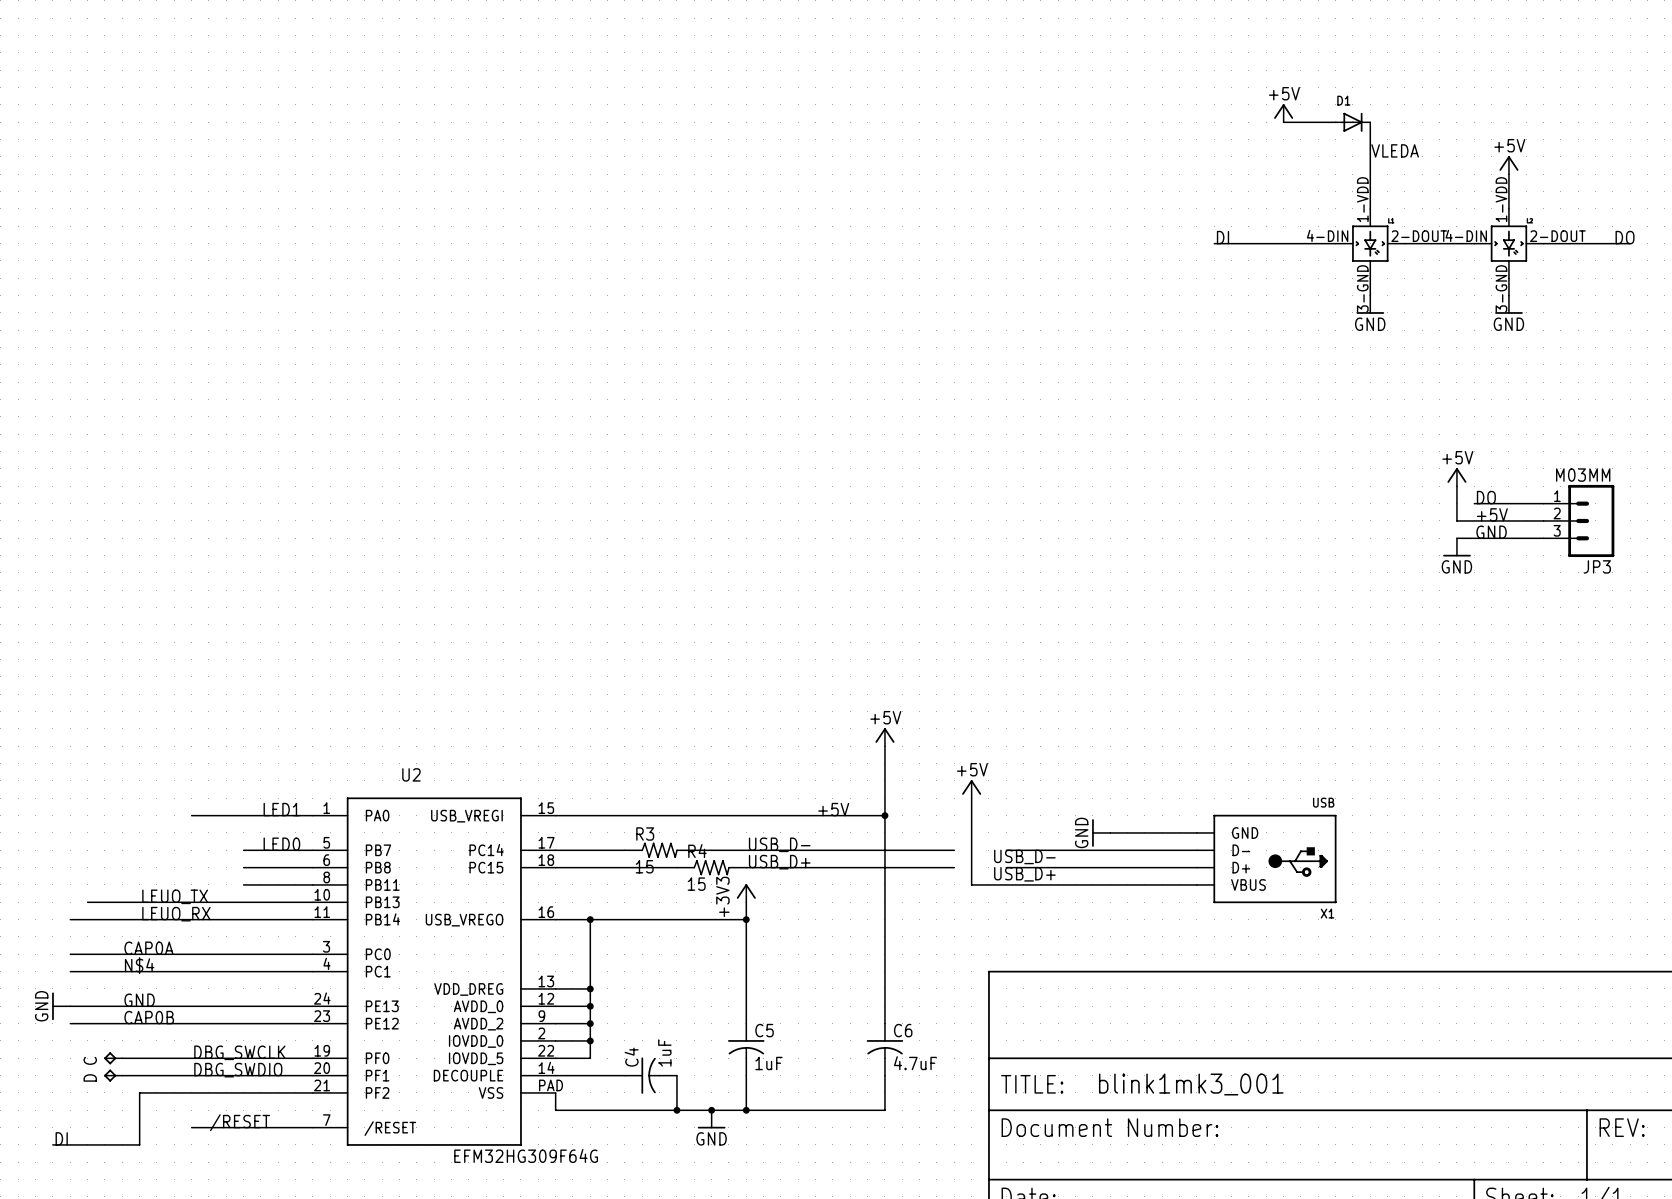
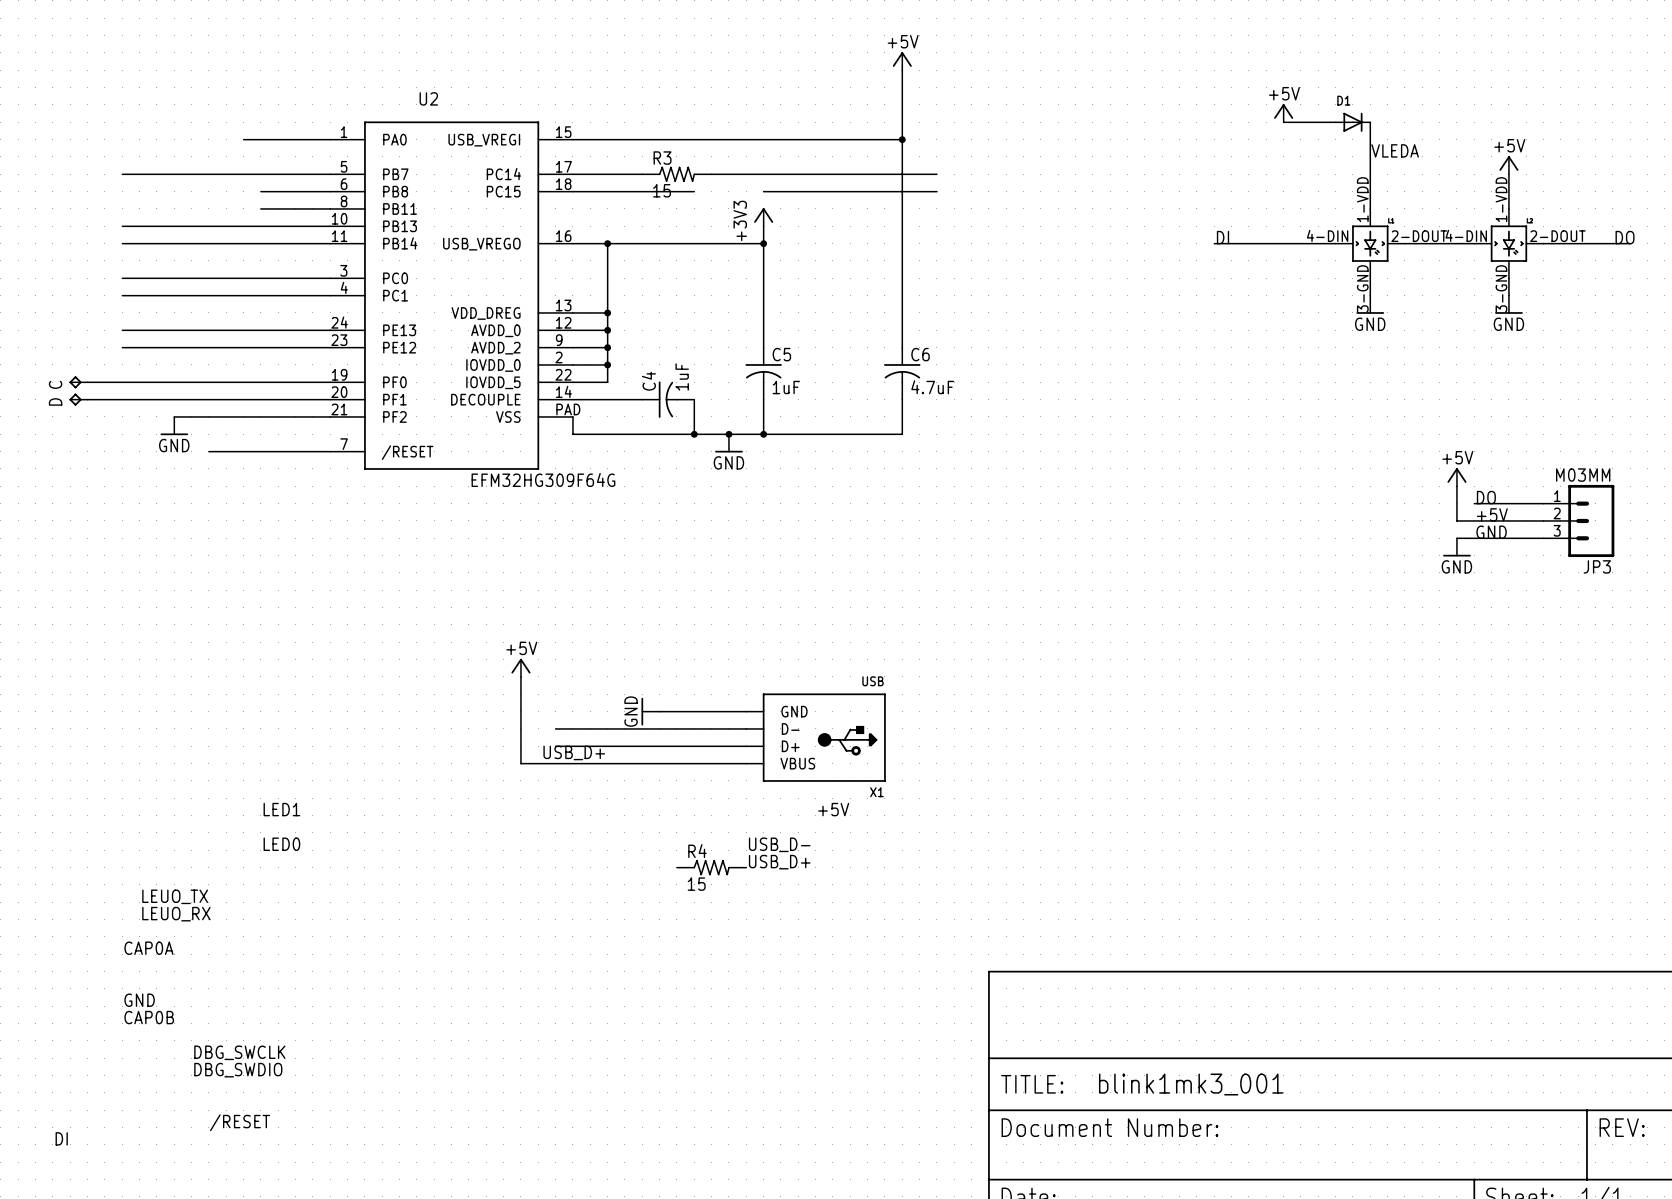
power symbol: none -> +5V (902, 61)
wire: none -> (902, 70) (902, 347)
wire: none -> (243, 139) (330, 139)
wire: none -> (572, 139) (902, 139)
junction: none -> (902, 139)
wire: none -> (122, 174) (330, 174)
wire: none -> (572, 174) (642, 174)
wire: none -> (711, 174) (936, 174)
wire: none -> (260, 191) (330, 191)
wire: none -> (572, 191) (694, 191)
wire: none -> (763, 191) (936, 191)
wire: none -> (260, 208) (330, 208)
power symbol: none -> +3V3 (763, 217)
wire: none -> (122, 226) (330, 226)
wire: none -> (763, 226) (763, 347)
wire: none -> (122, 243) (330, 243)
wire: none -> (572, 243) (763, 243)
wire: none -> (607, 243) (607, 382) (572, 382)
junction: none -> (607, 243)
junction: none -> (763, 243)
wire: none -> (122, 278) (330, 278)
wire: none -> (122, 295) (330, 295)
wire: none -> (572, 312) (607, 312)
junction: none -> (607, 312)
wire: none -> (122, 330) (330, 330)
wire: none -> (572, 330) (607, 330)
junction: none -> (607, 330)
wire: none -> (122, 347) (330, 347)
wire: none -> (572, 347) (607, 347)
junction: none -> (607, 347)
wire: none -> (572, 364) (607, 364)
junction: none -> (607, 364)
C: none -> (78, 382)
wire: none -> (87, 382) (330, 382)
D: none -> (78, 399)
wire: none -> (87, 399) (330, 399)
wire: none -> (572, 399) (642, 399)
wire: none -> (694, 399) (694, 434)
wire: none -> (763, 399) (763, 434)
wire: none -> (902, 399) (902, 434) (572, 434) (572, 416)
wire: none -> (174, 416) (330, 416)
power symbol: none -> GND (174, 426)
junction: none -> (694, 434)
junction: none -> (728, 434)
junction: none -> (763, 434)
power symbol: none -> GND (728, 443)
wire: none -> (208, 451) (330, 451)
power symbol: none -> +5V (520, 667)
wire: none -> (520, 676) (520, 763) (746, 763)
power symbol: none -> GND (650, 711)
wire: none -> (659, 711) (746, 711)
wire: none -> (555, 728) (746, 728)
power symbol: +5V (884, 737) -> none
wire: none -> (555, 746) (746, 746)
wire: (884, 746) (884, 1023) -> none
label: none -> USB_D+ (574, 752)
power symbol: +5V (971, 789) -> none
wire: (971, 798) (971, 884) (1196, 884) -> none
wire: (191, 815) (312, 815) -> none
wire: (555, 815) (884, 815) -> none
junction: (884, 815) -> none
power symbol: GND (1101, 832) -> none
wire: (1110, 832) (1196, 832) -> none
wire: (243, 850) (312, 850) -> none
wire: (555, 850) (624, 850) -> none
R3 position: (659, 850) -> (676, 174)
wire: (694, 850) (954, 850) -> none
wire: (1006, 850) (1196, 850) -> none
label: USB_D- (1024, 856) -> none
X1 position: (1266, 858) -> (816, 737)
wire: (243, 867) (312, 867) -> none
wire: (555, 867) (676, 867) -> none
wire: (746, 867) (954, 867) -> none
wire: (1006, 867) (1196, 867) -> none
label: USB_D+ (1024, 874) -> none
wire: (243, 884) (312, 884) -> none
power symbol: +3V3 (746, 893) -> none
wire: (87, 902) (312, 902) -> none
wire: (746, 902) (746, 1023) -> none
wire: (70, 919) (312, 919) -> none
wire: (555, 919) (746, 919) -> none
wire: (590, 919) (590, 1058) (555, 1058) -> none
junction: (590, 919) -> none
junction: (746, 919) -> none
wire: (70, 954) (312, 954) -> none
label: N$4 (139, 965) -> none
wire: (70, 971) (312, 971) -> none
U2 position: (434, 971) -> (451, 295)
wire: (555, 988) (590, 988) -> none
junction: (590, 988) -> none
power symbol: GND (61, 1006) -> none
wire: (70, 1006) (312, 1006) -> none
wire: (555, 1006) (590, 1006) -> none
junction: (590, 1006) -> none
wire: (70, 1023) (312, 1023) -> none
wire: (555, 1023) (590, 1023) -> none
junction: (590, 1023) -> none
wire: (555, 1040) (590, 1040) -> none
junction: (590, 1040) -> none
C5 position: (746, 1049) -> (763, 373)
C6 position: (884, 1049) -> (902, 373)
C: (113, 1058) -> none
wire: (122, 1058) (312, 1058) -> none
D: (113, 1075) -> none
wire: (122, 1075) (312, 1075) -> none
wire: (555, 1075) (624, 1075) -> none
C4 position: (650, 1075) -> (668, 399)
wire: (676, 1075) (676, 1110) -> none
wire: (746, 1075) (746, 1110) -> none
wire: (884, 1075) (884, 1110) (555, 1110) (555, 1092) -> none
wire: (312, 1092) (139, 1092) (139, 1144) (52, 1144) -> none
junction: (676, 1110) -> none
junction: (711, 1110) -> none
junction: (746, 1110) -> none
power symbol: GND (711, 1119) -> none
wire: (191, 1127) (312, 1127) -> none

